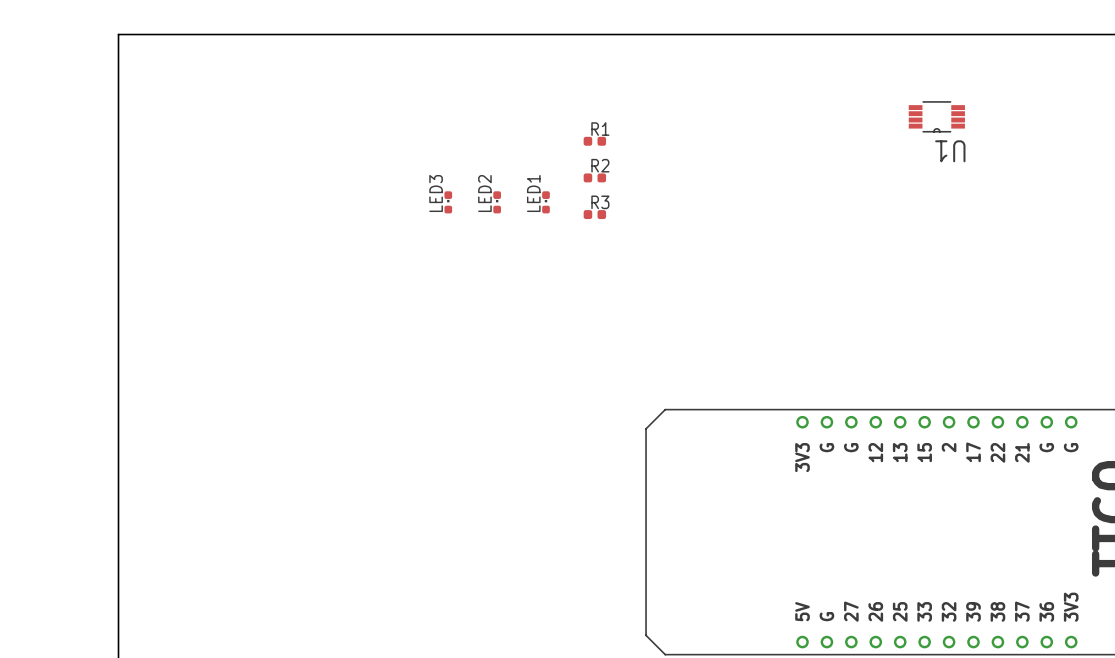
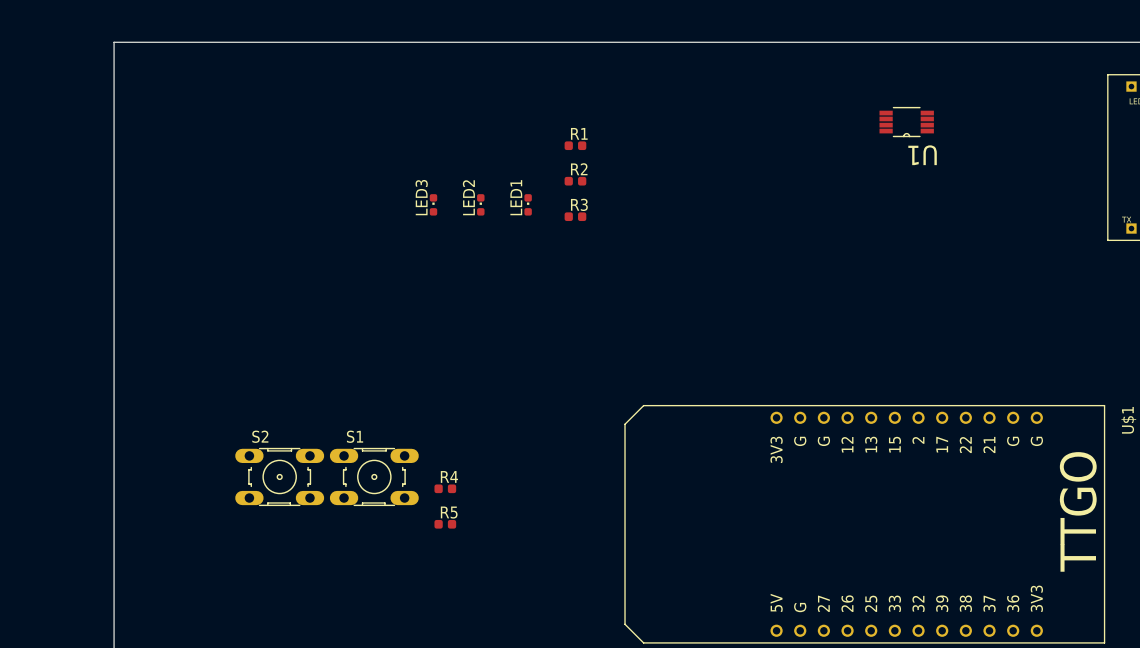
S2: none -> (279, 476)
S1: none -> (374, 476)
R4: none -> (445, 488)
R5: none -> (445, 524)

